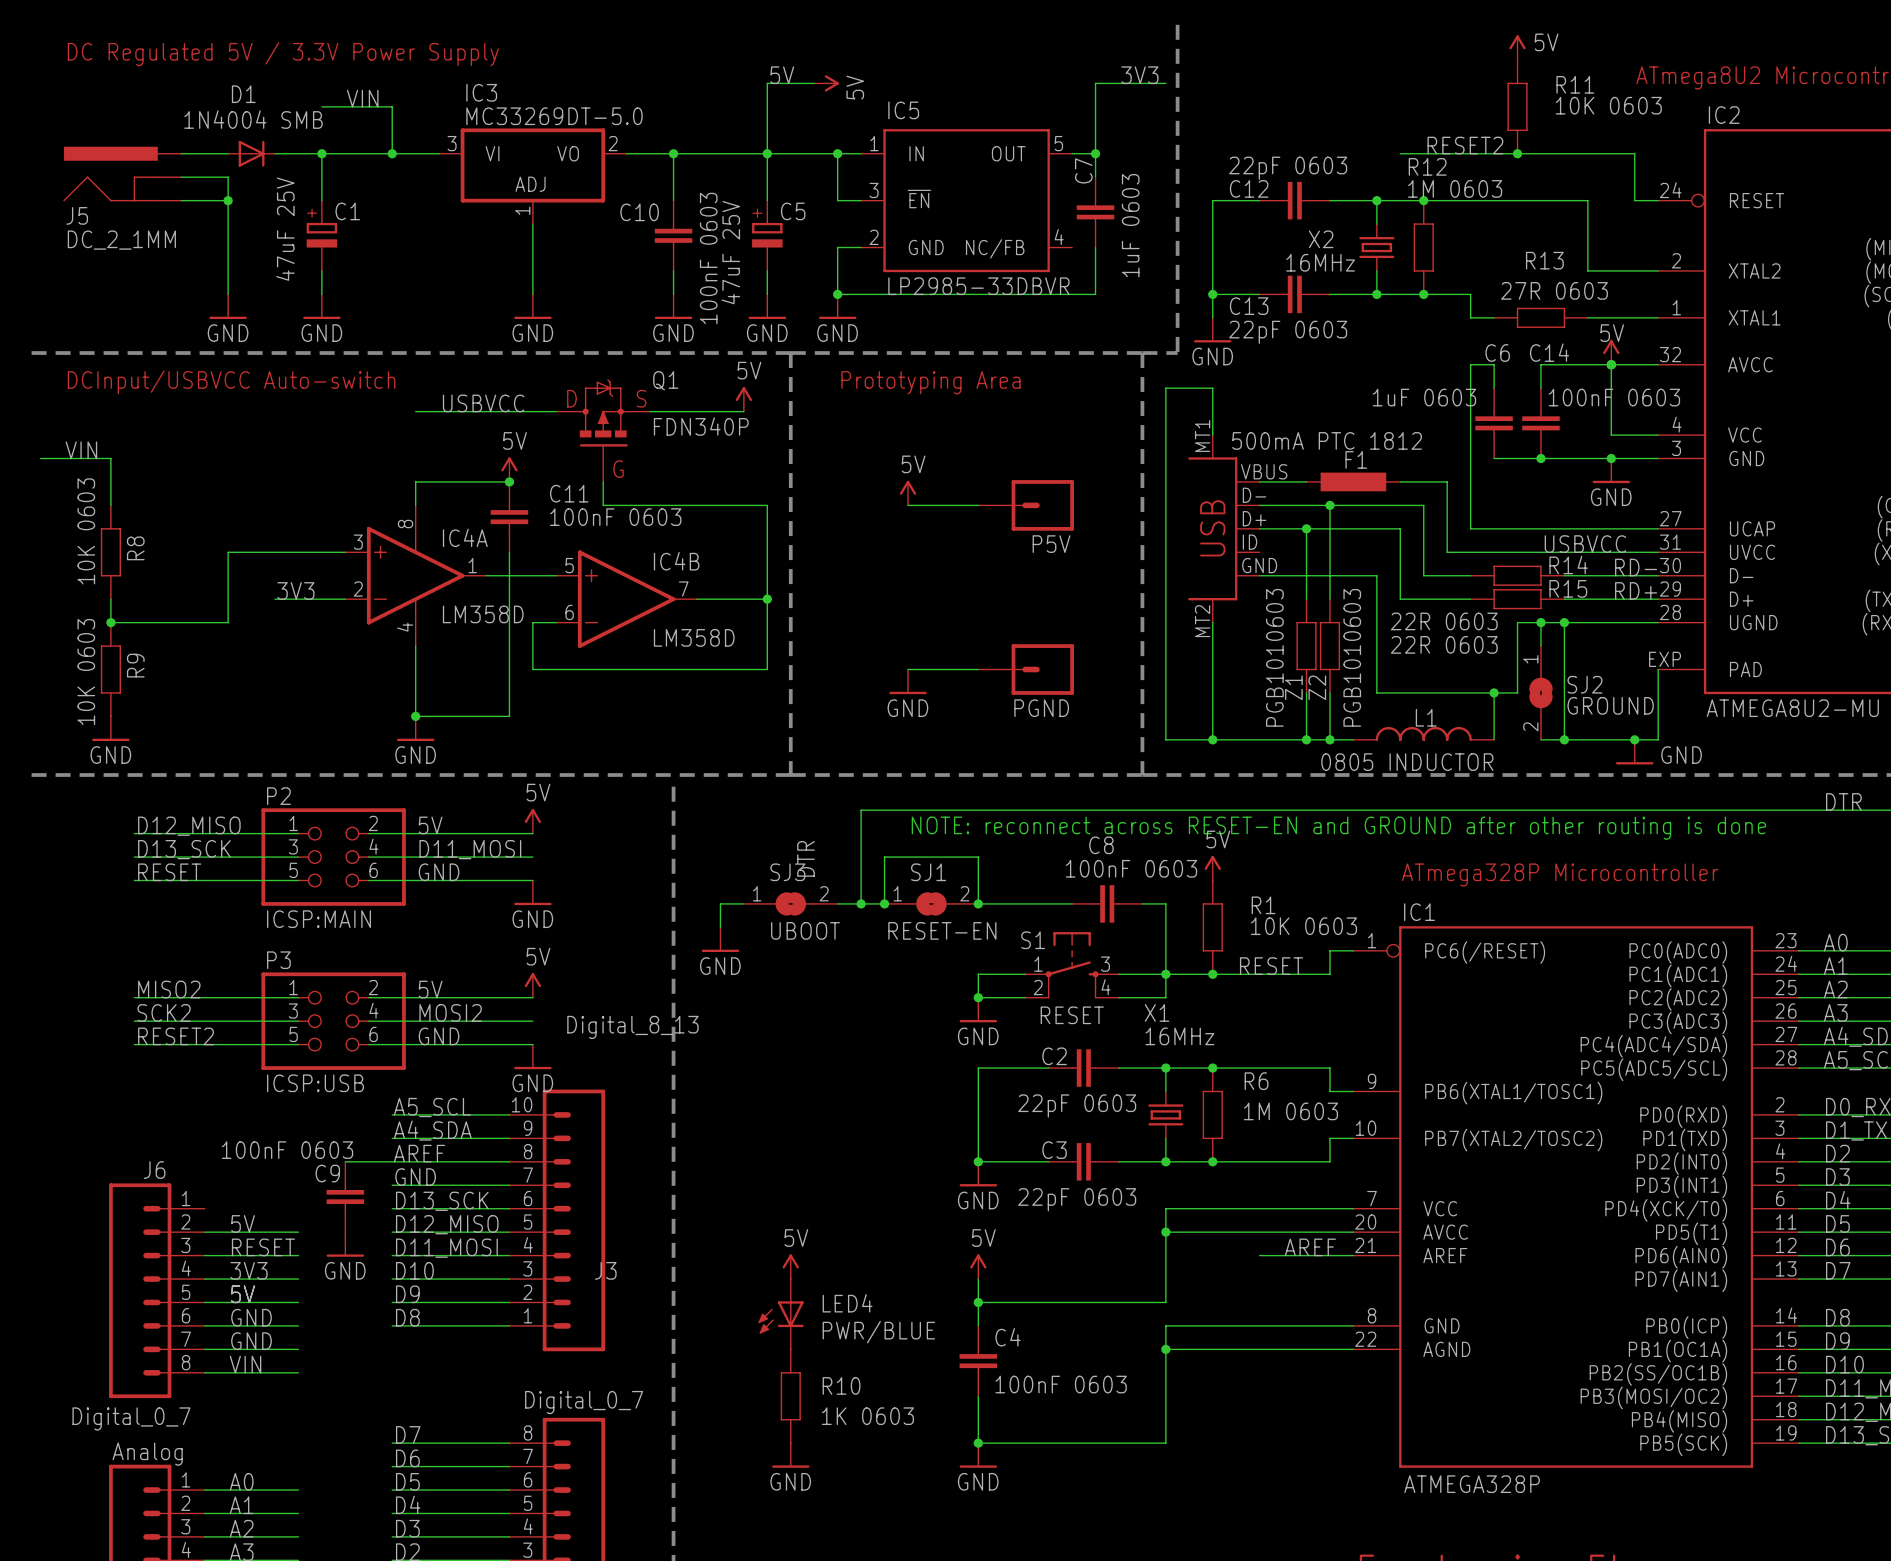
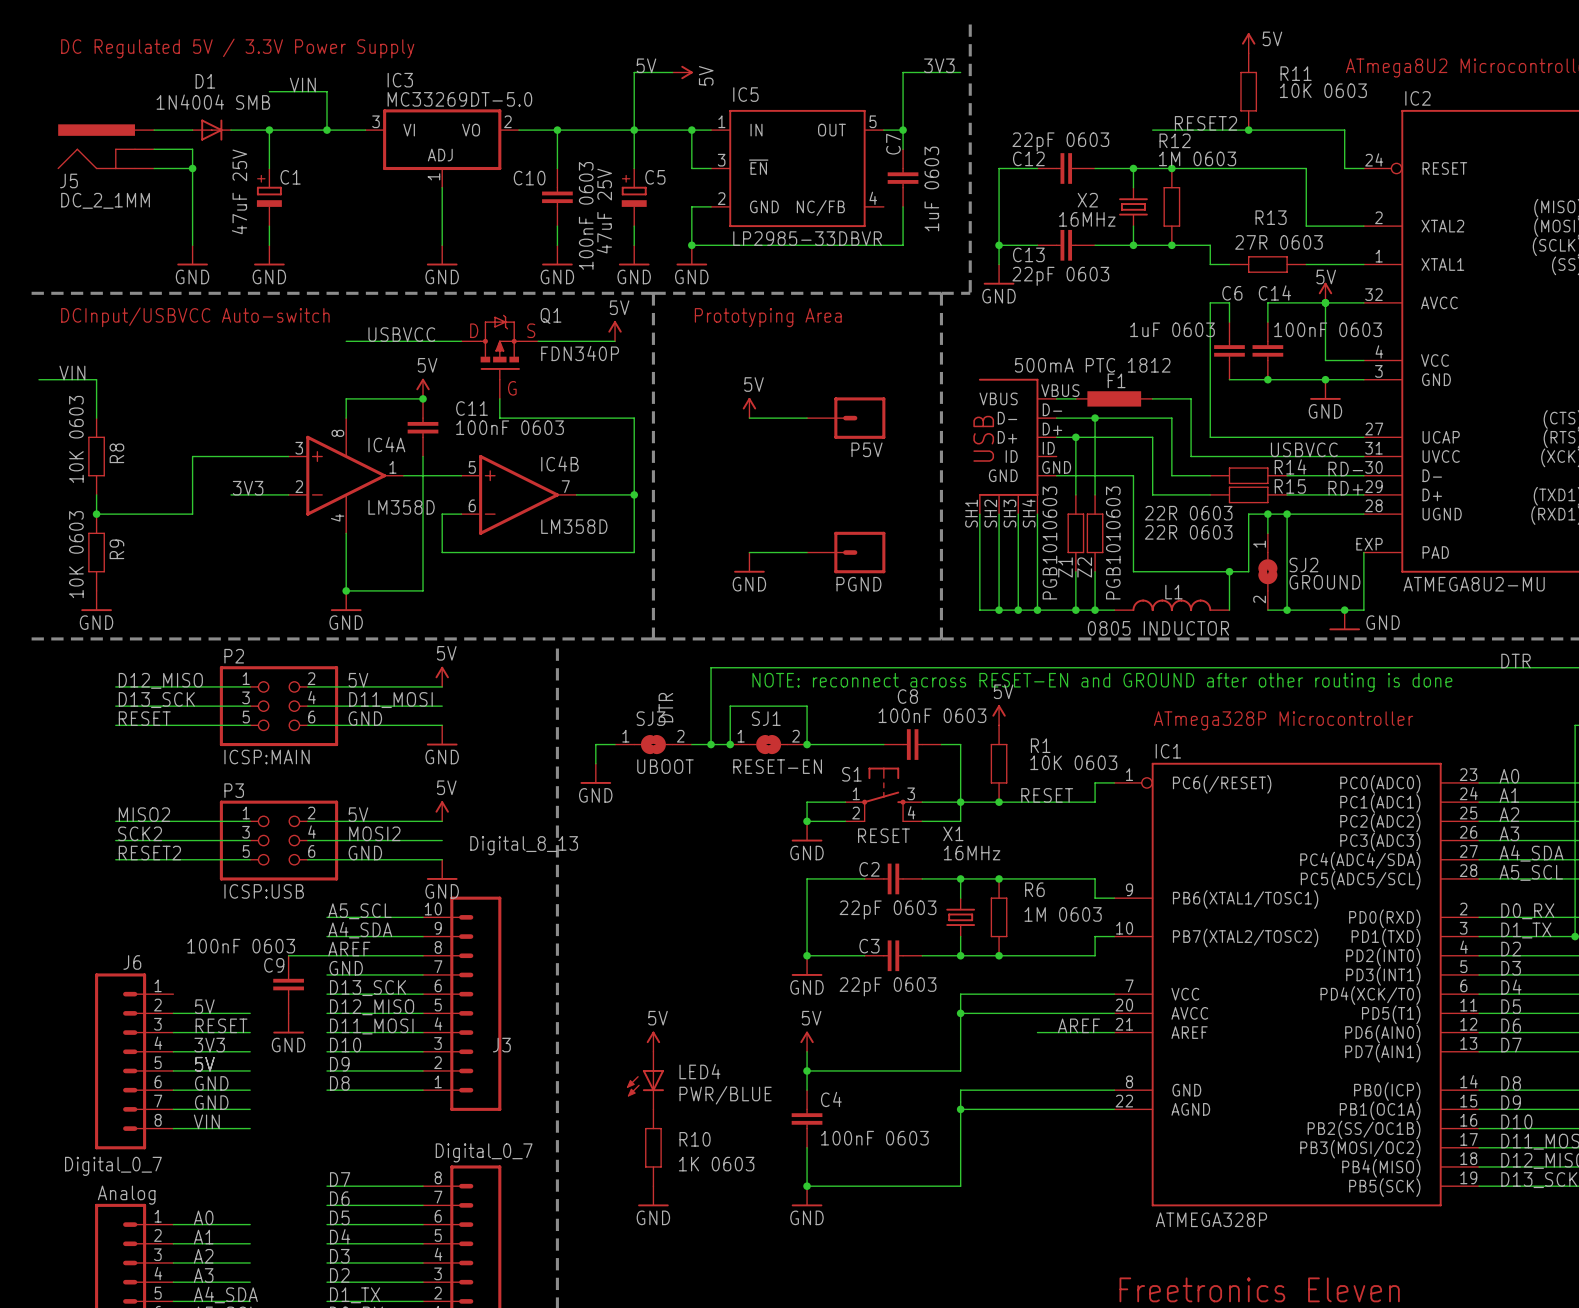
wire: (1212, 435) (1212, 388) (1165, 388) (1165, 739) (1189, 739) -> (979, 514) (979, 610)
part: (1223, 528) -> none
part: none -> (1017, 446)
wire: none -> (1018, 514) (1018, 610)
wire: none -> (1037, 514) (1037, 610)
junction: none -> (1018, 610)
junction: none -> (1037, 610)

